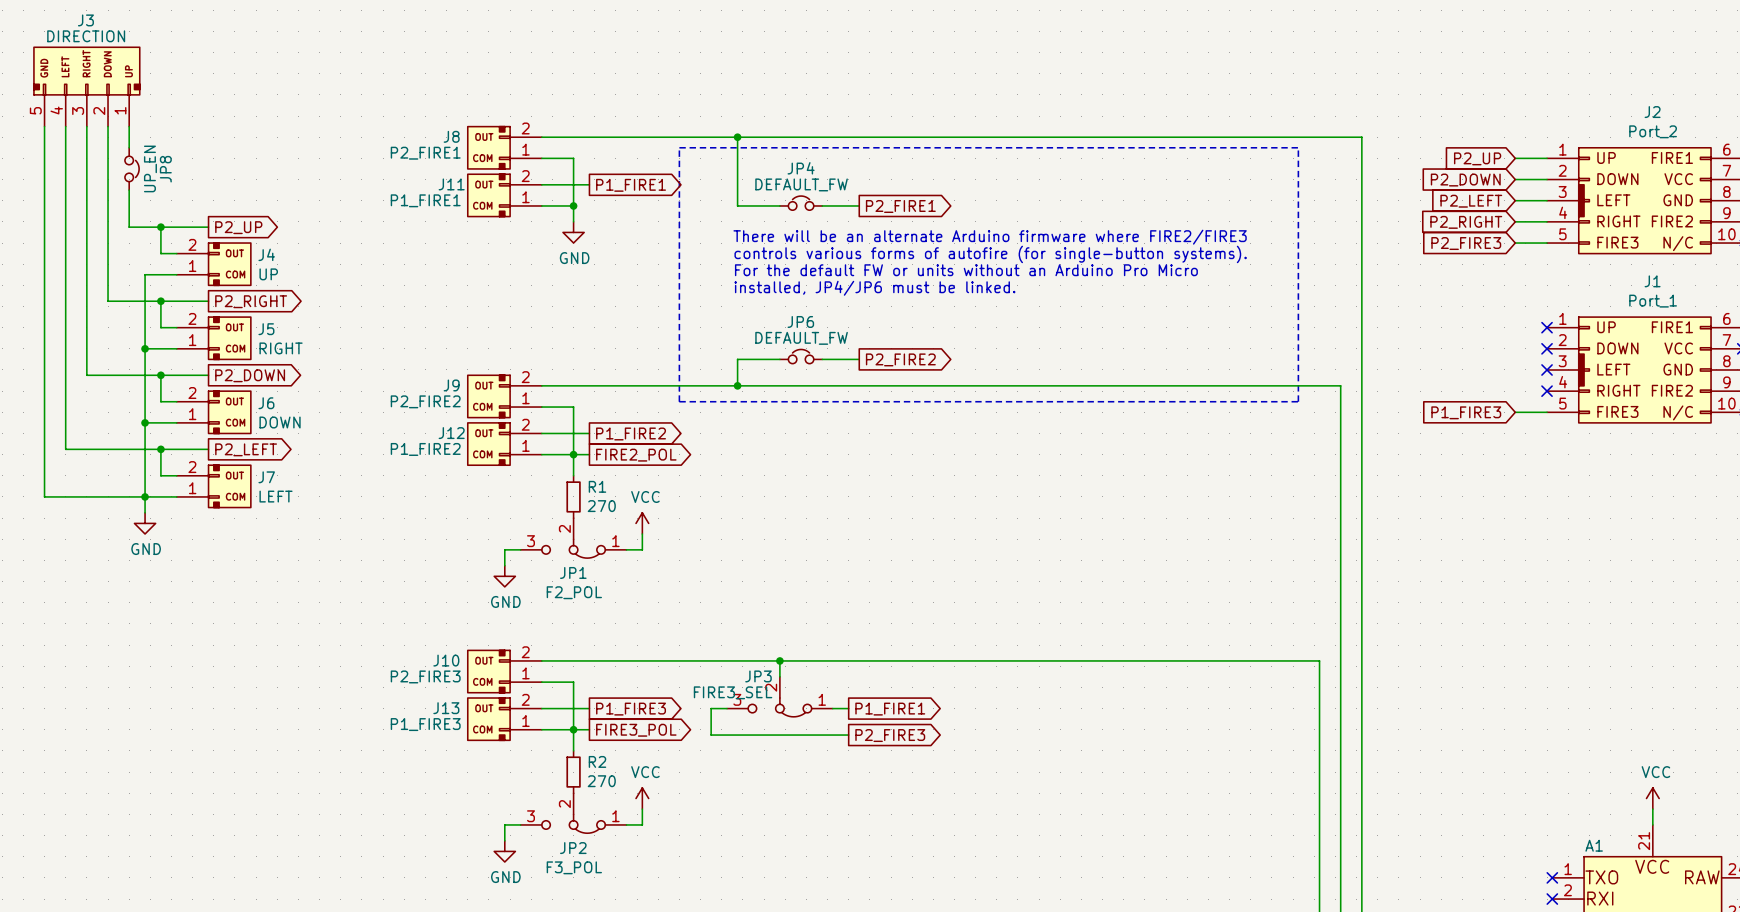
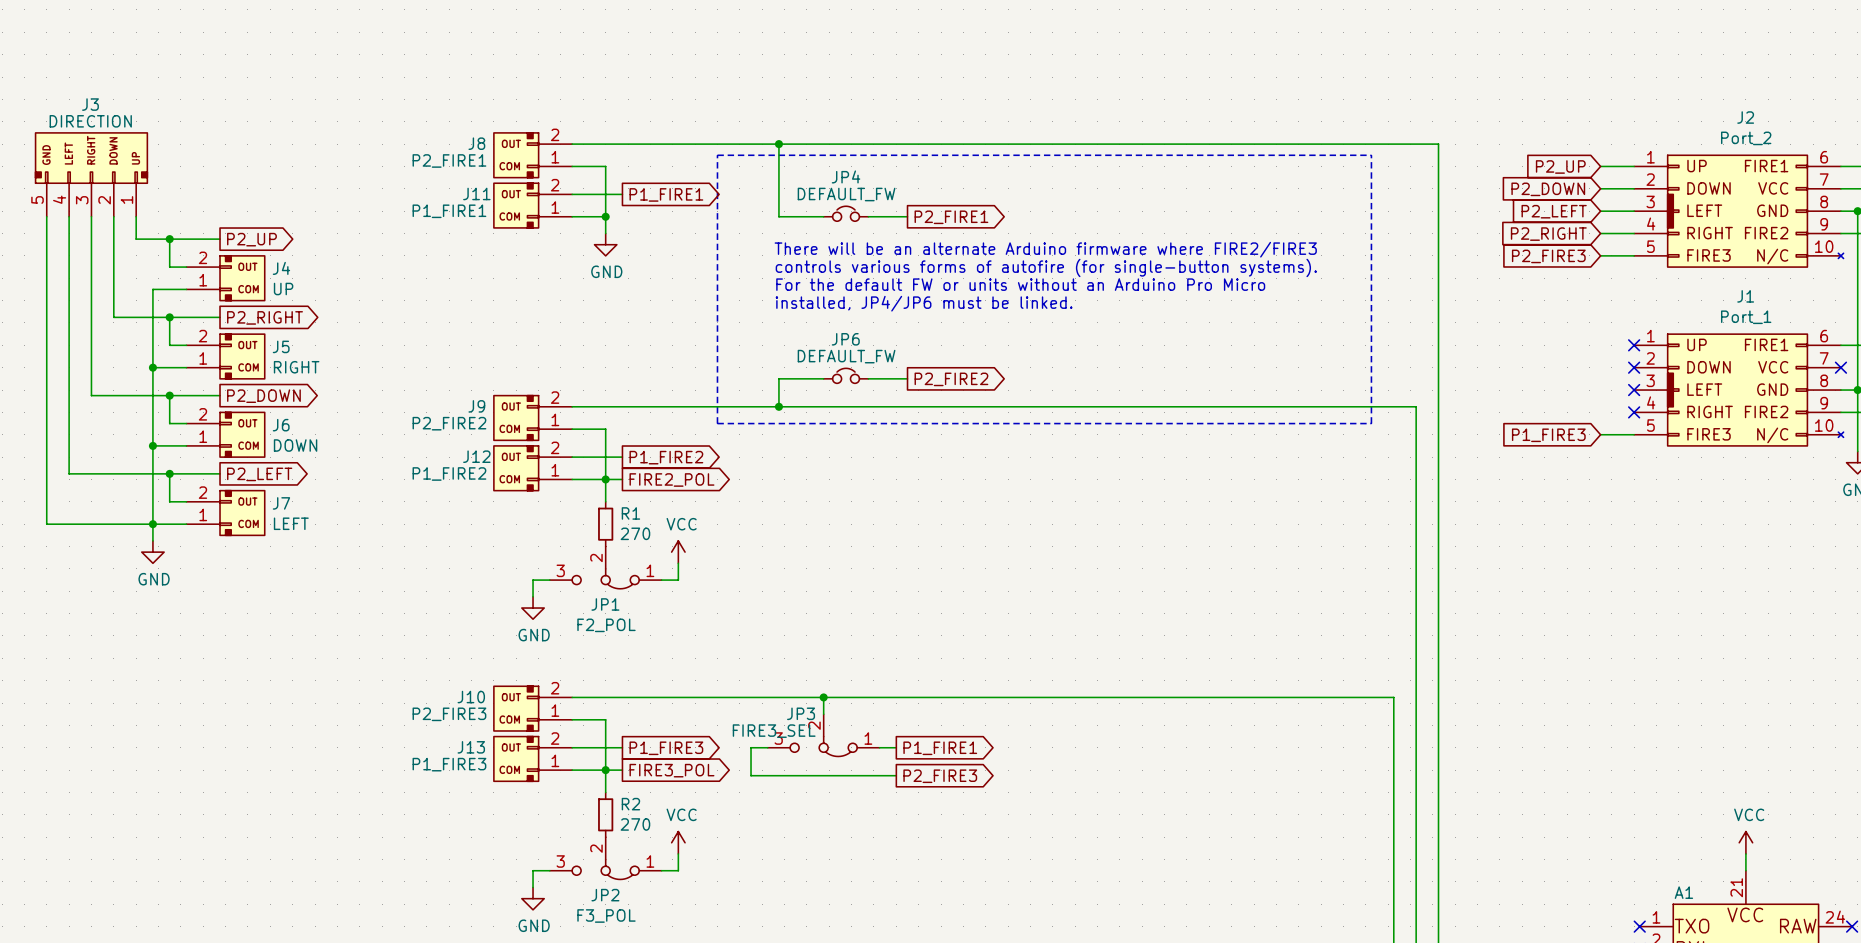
J3 position: (86, 86) -> (91, 174)
JP8: UP_EN (132, 168) -> none

